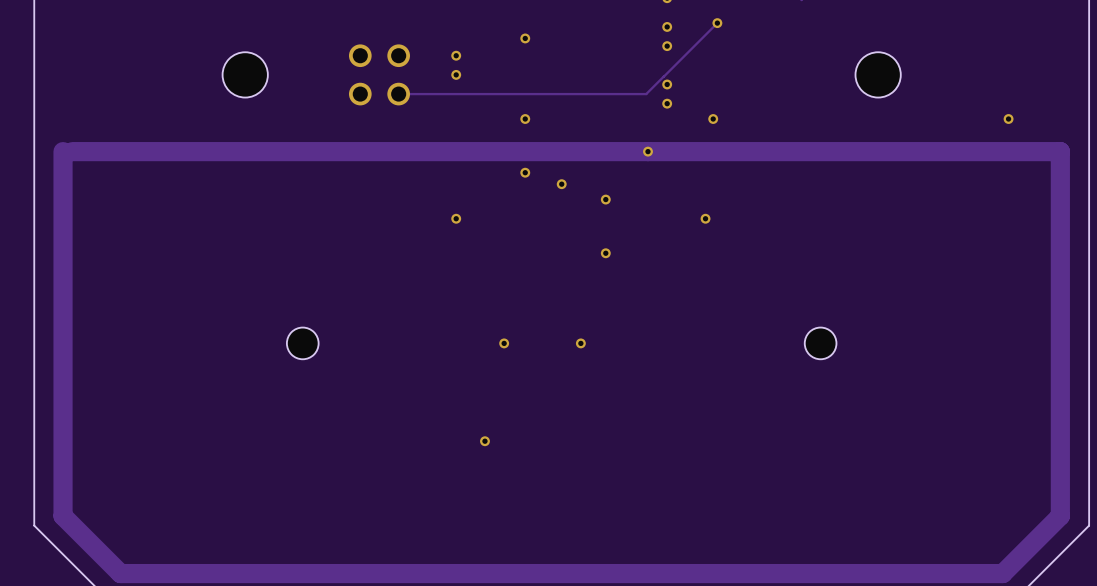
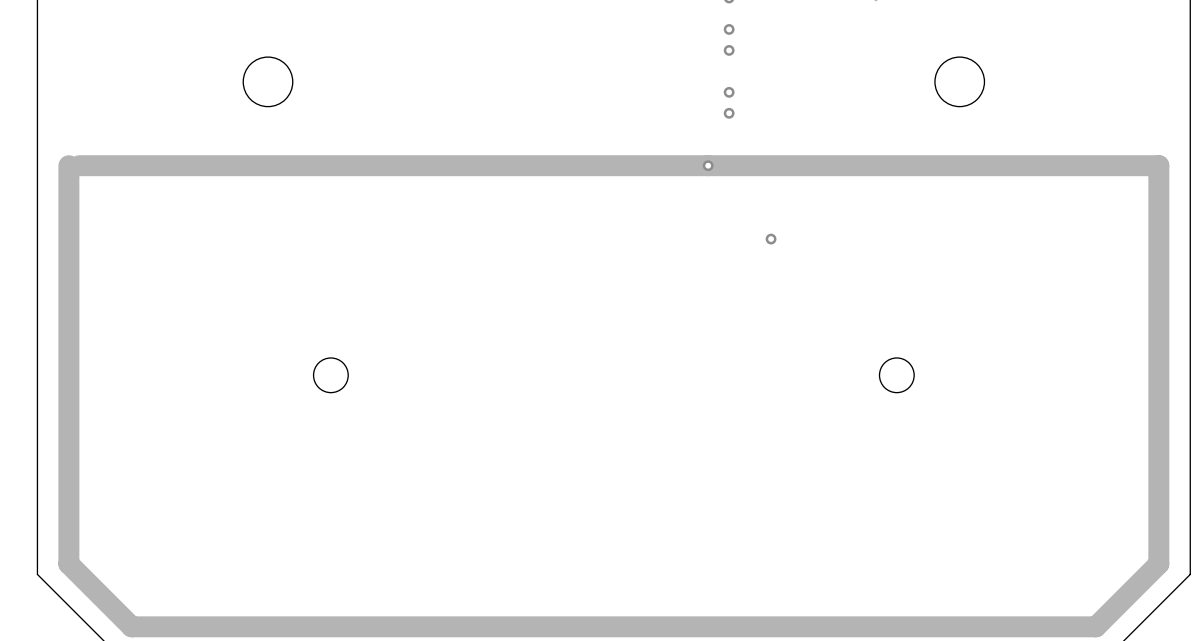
track: (717, 23) (646, 94) (398, 94) -> none
via: (717, 23) -> none
via: (525, 38) -> none
via: (360, 55) -> none
via: (398, 55) -> none
via: (456, 55) -> none
via: (456, 74) -> none
via: (360, 94) -> none
via: (398, 94) -> none
via: (525, 119) -> none
via: (713, 119) -> none
via: (1008, 119) -> none
via: (525, 172) -> none
via: (561, 184) -> none
via: (605, 199) -> none
via: (456, 218) -> none
via: (605, 253) -> none
via: (504, 343) -> none
via: (580, 343) -> none
via: (484, 441) -> none

